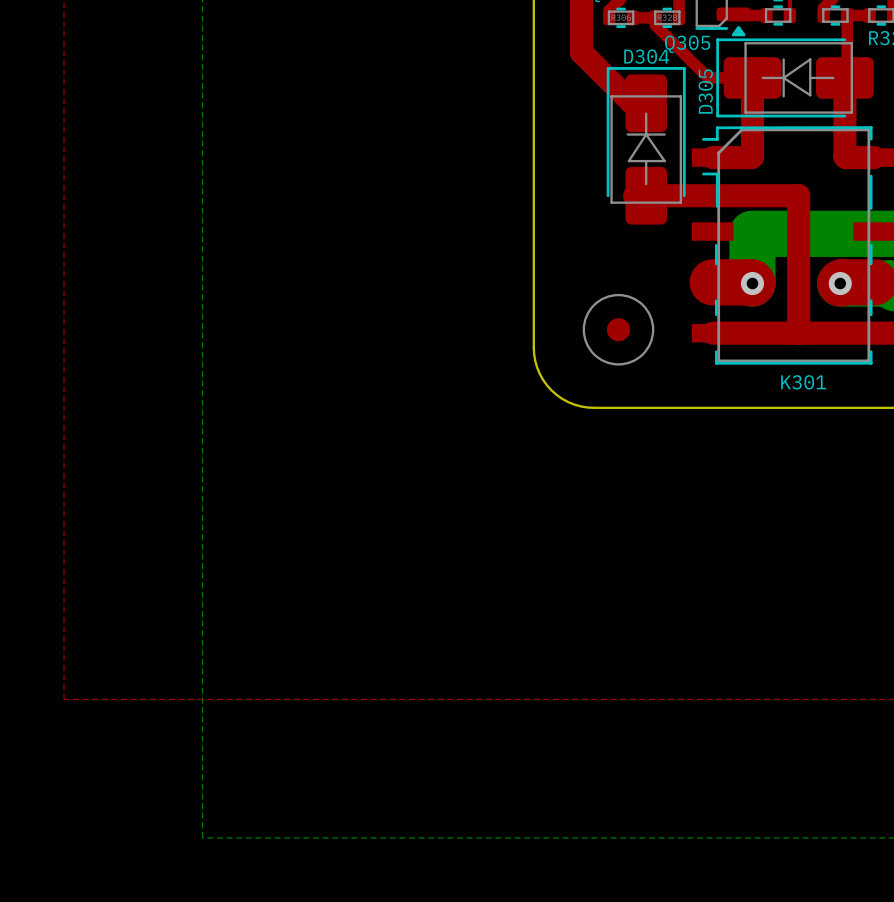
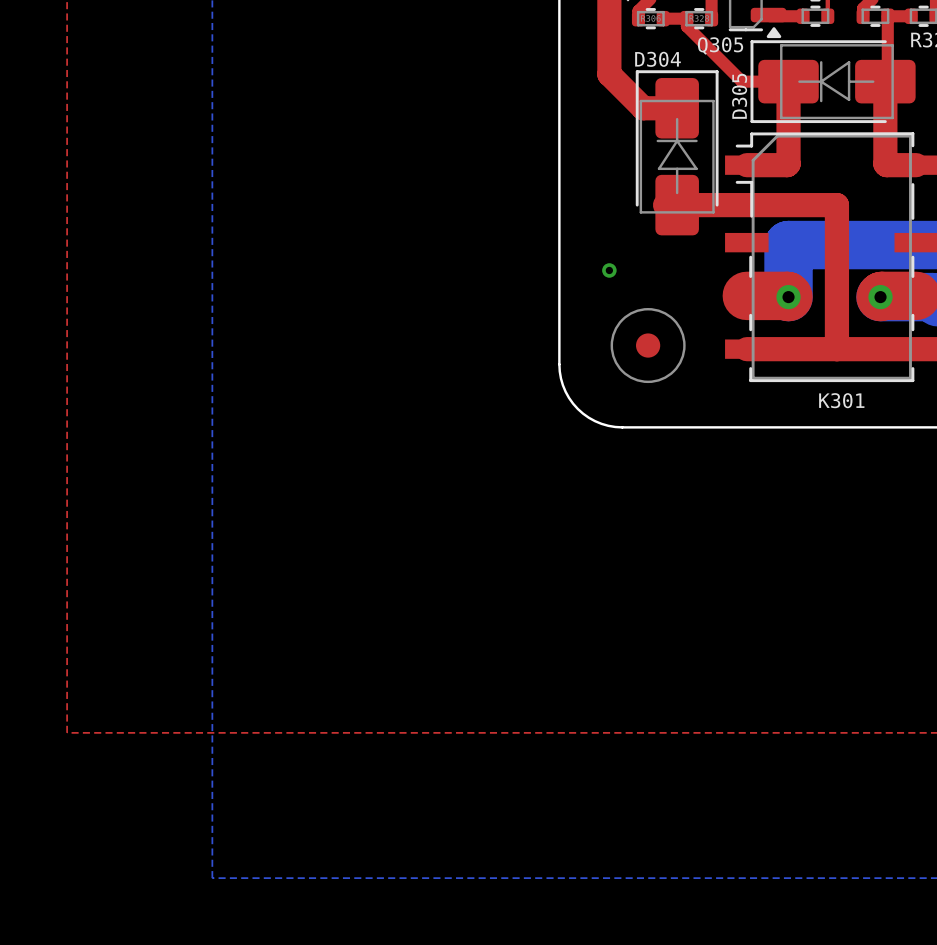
top track: (581, 52) (632, 103) -> (609, 55) (609, 74) (643, 108) (662, 108)
D304 name position: D304 (646, 56) -> D304 (657, 59)
via: none -> (609, 270)

